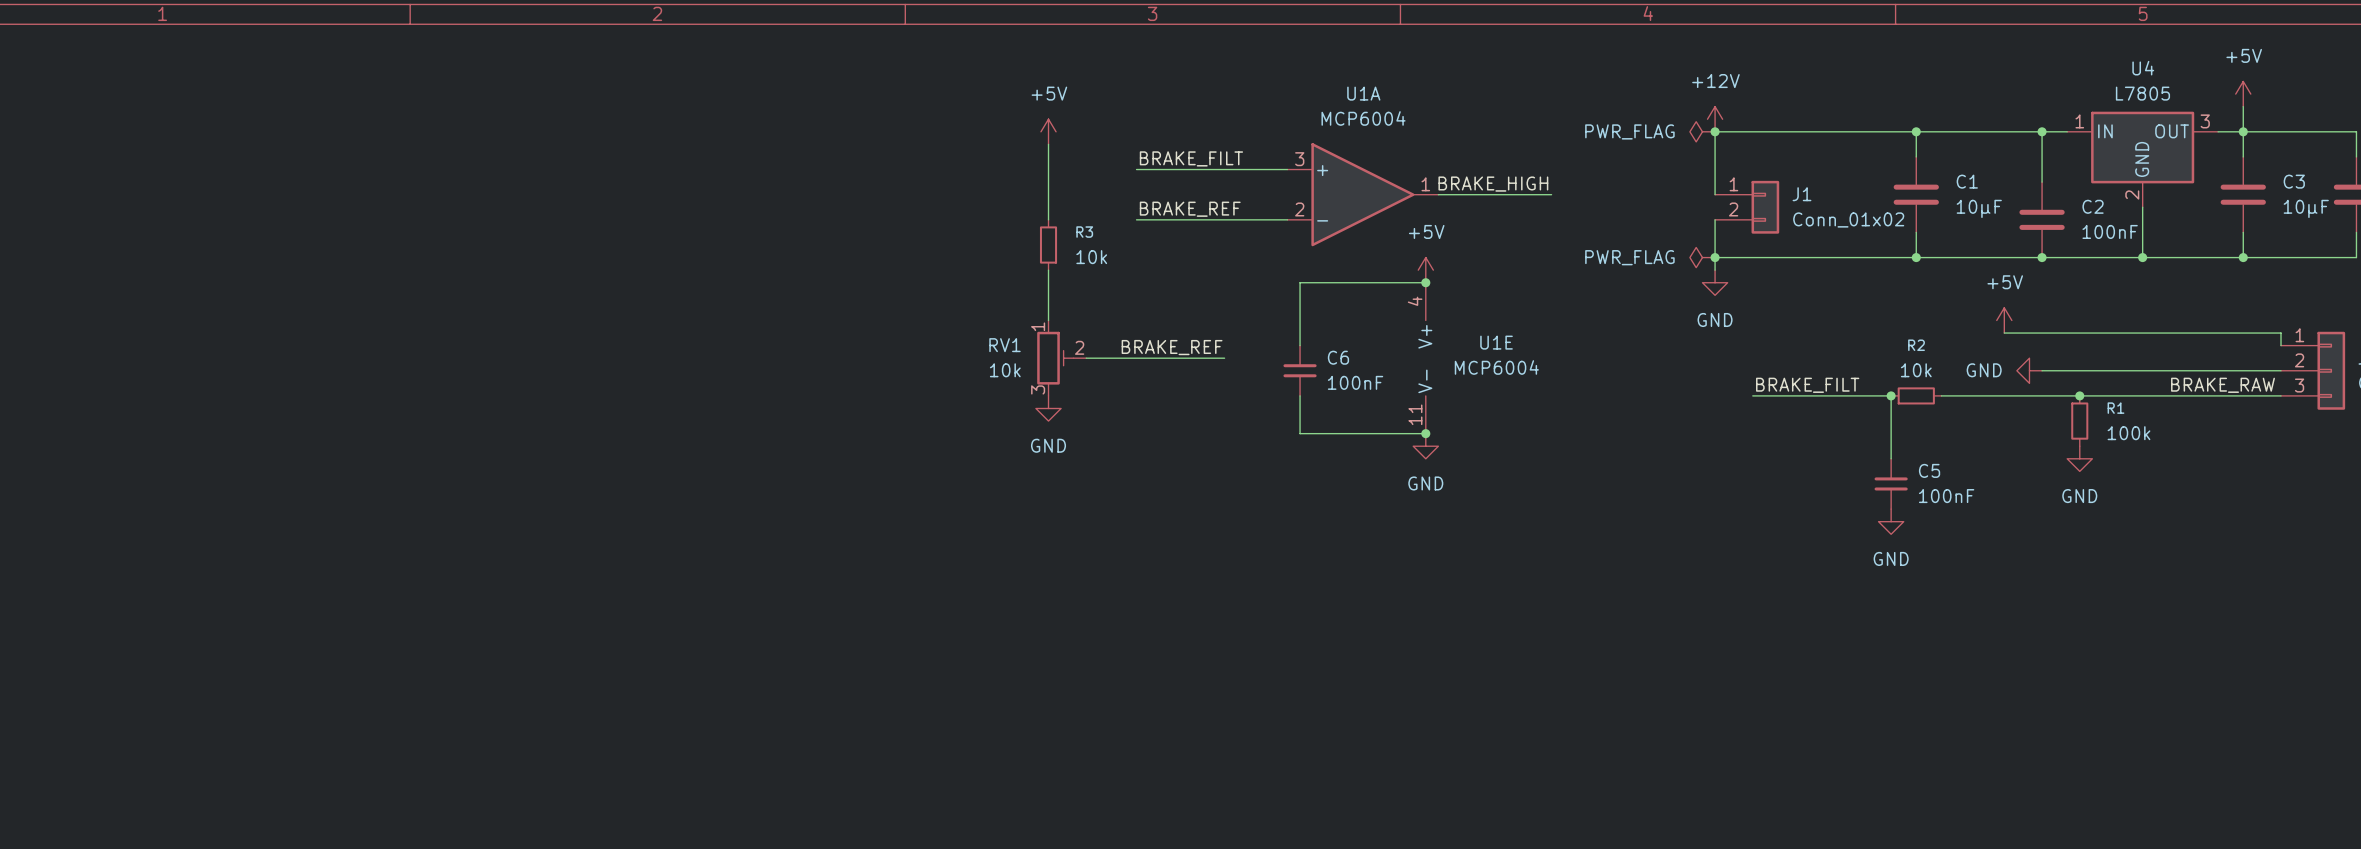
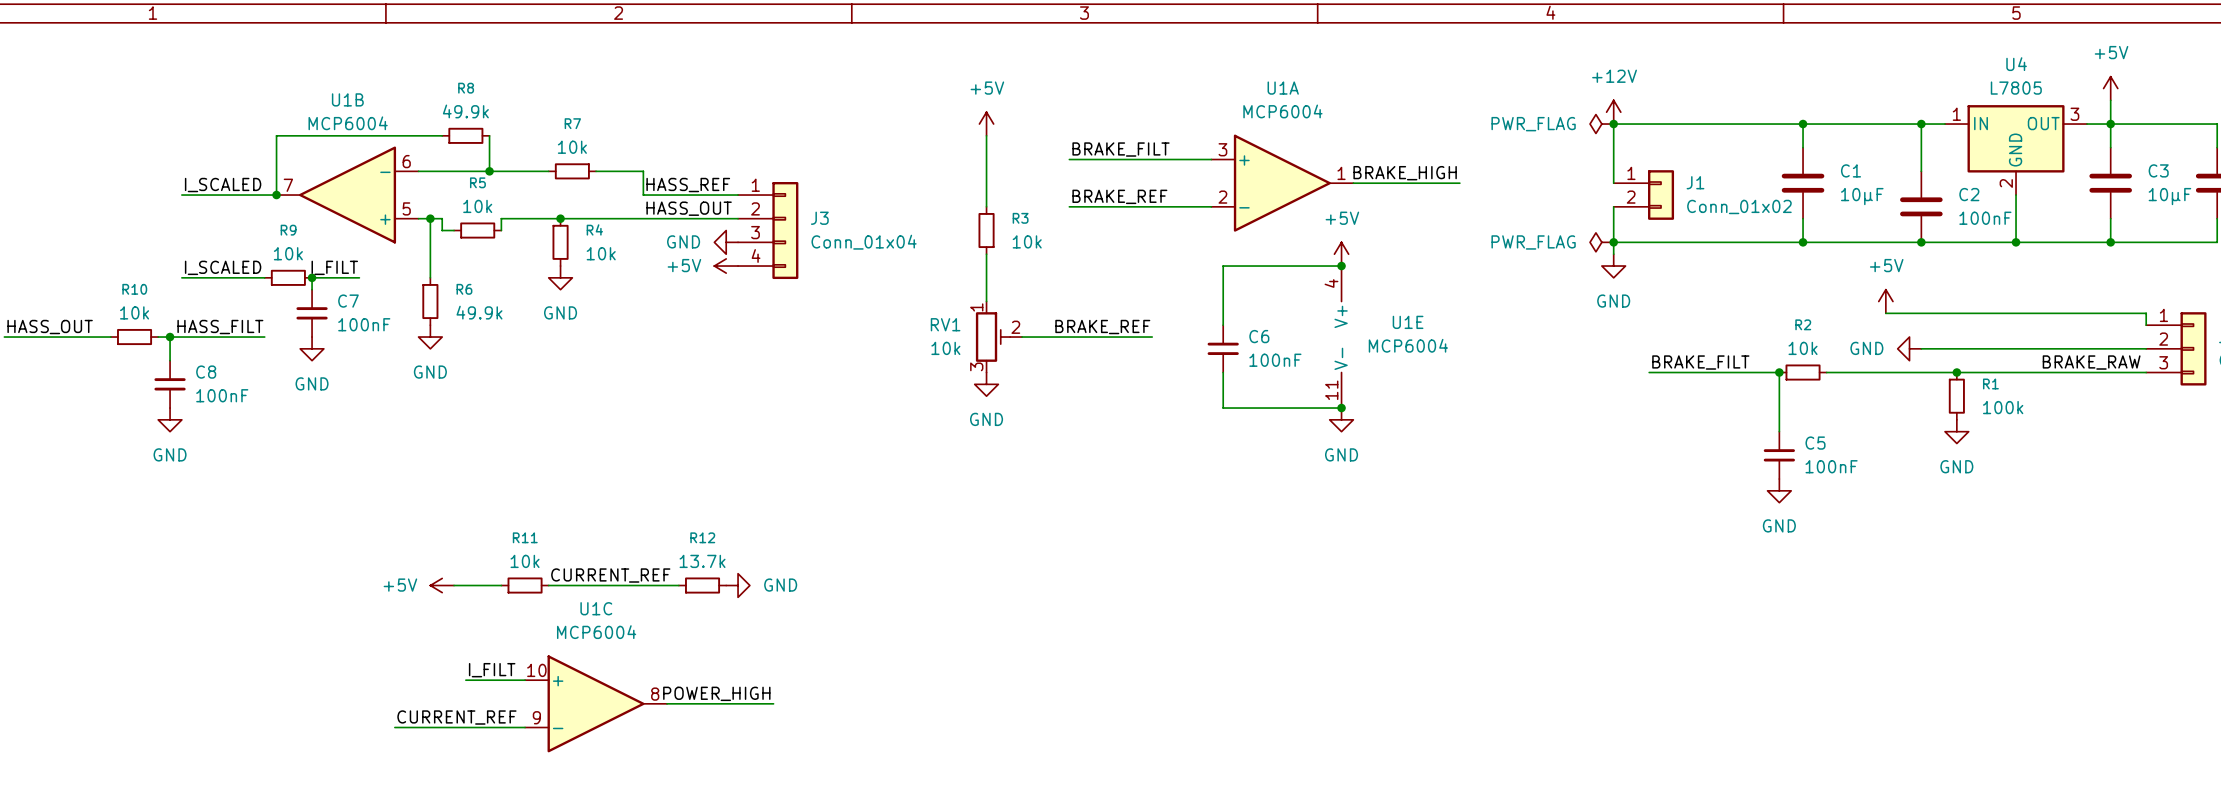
wire: none -> (442, 135) (276, 135) (276, 195) (181, 195)
R8: none -> 49.9k (465, 135)
wire: none -> (489, 135) (489, 171)
wire: none -> (418, 171) (548, 171)
junction: none -> (489, 171)
R7: none -> 10k (572, 171)
wire: none -> (596, 171) (643, 171) (643, 195) (738, 195)
label: none -> I_SCALED (223, 185)
label: none -> HASS_REF (688, 185)
junction: none -> (276, 195)
U1B: none -> MCP6004 (347, 195)
label: none -> HASS_OUT (689, 208)
wire: none -> (418, 218) (442, 218) (442, 230) (454, 230)
wire: none -> (430, 218) (430, 277)
junction: none -> (430, 218)
junction: none -> (560, 218)
wire: none -> (738, 218) (501, 218) (501, 230)
R5: none -> 10k (477, 230)
J3: none -> Conn_01x04 (768, 230)
R4: none -> 10k (560, 242)
power symbol: none -> GND (726, 242)
power symbol: none -> +5V (726, 266)
label: none -> I_SCALED (223, 267)
label: none -> I_FILT (334, 267)
wire: none -> (181, 277) (264, 277)
R9: none -> 10k (288, 277)
junction: none -> (312, 277)
wire: none -> (359, 277) (312, 277) (312, 289)
power symbol: none -> GND (560, 277)
R6: none -> 49.9k (430, 301)
C7: none -> 100nF (312, 313)
label: none -> HASS_OUT (50, 327)
label: none -> HASS_FILT (220, 327)
wire: none -> (4, 337) (110, 337)
R10: none -> 10k (134, 337)
wire: none -> (158, 337) (264, 337)
wire: none -> (170, 337) (170, 360)
junction: none -> (170, 337)
power symbol: none -> GND (430, 337)
power symbol: none -> GND (312, 348)
C8: none -> 100nF (170, 384)
power symbol: none -> GND (170, 419)
label: none -> CURRENT_REF (610, 575)
power symbol: none -> +5V (442, 585)
wire: none -> (454, 585) (501, 585)
R11: none -> 10k (525, 585)
wire: none -> (548, 585) (678, 585)
R12: none -> 13.7k (702, 585)
power symbol: none -> GND (738, 585)
label: none -> I_FILT (492, 670)
wire: none -> (465, 680) (525, 680)
label: none -> POWER_HIGH (716, 693)
U1C: none -> MCP6004 (596, 703)
wire: none -> (667, 703) (773, 703)
label: none -> CURRENT_REF (456, 717)
wire: none -> (394, 727) (525, 727)

